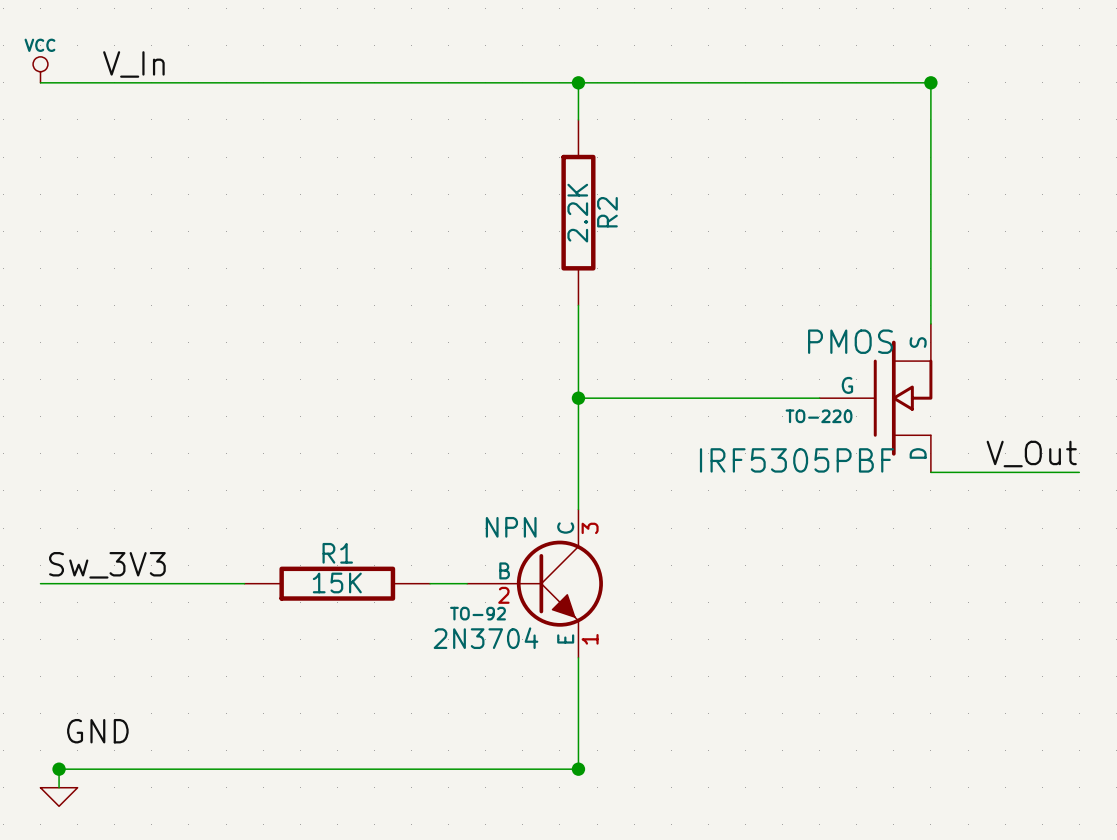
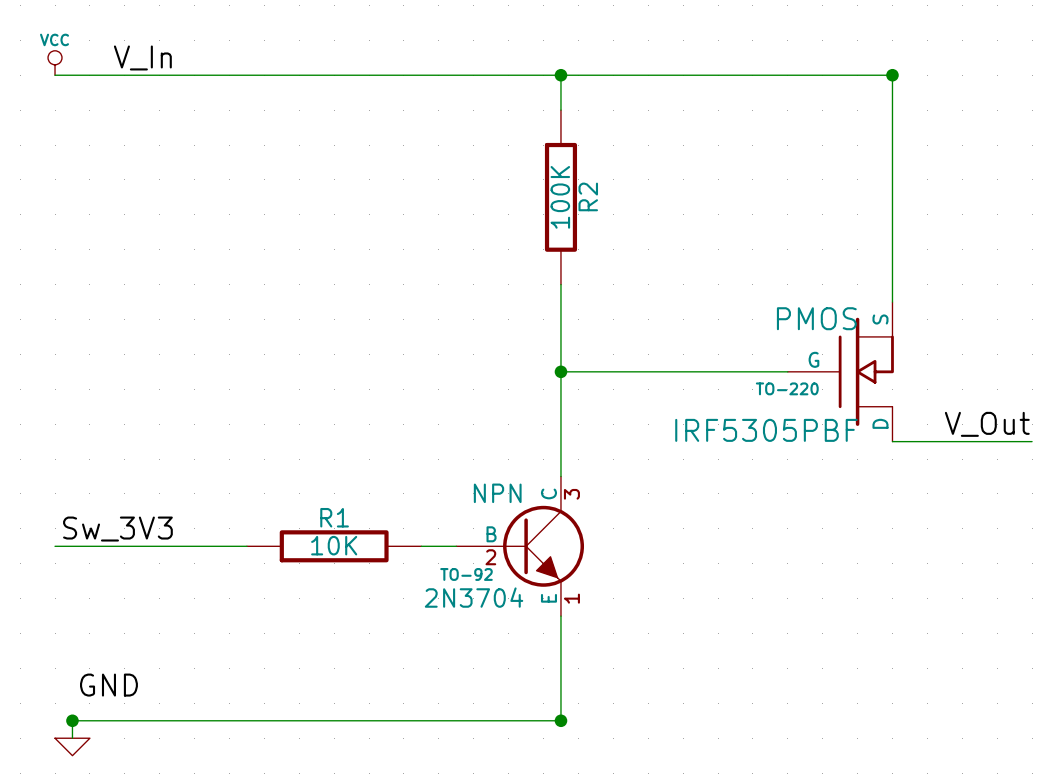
R2 value: 2.2K (577, 213) -> 100K (560, 197)
R1 value: 15K (337, 582) -> 10K (334, 545)

